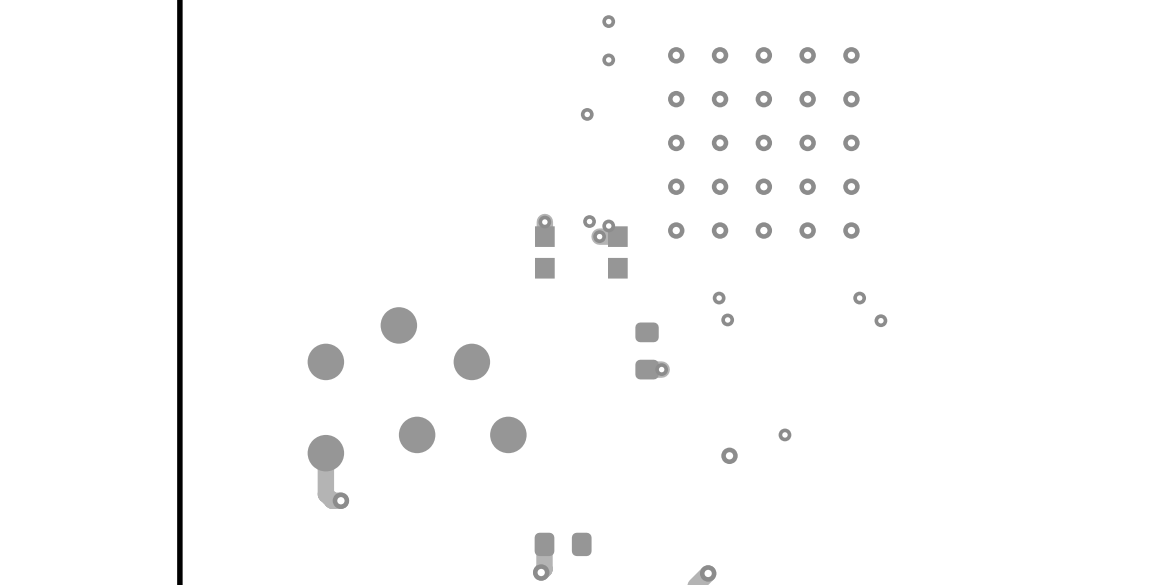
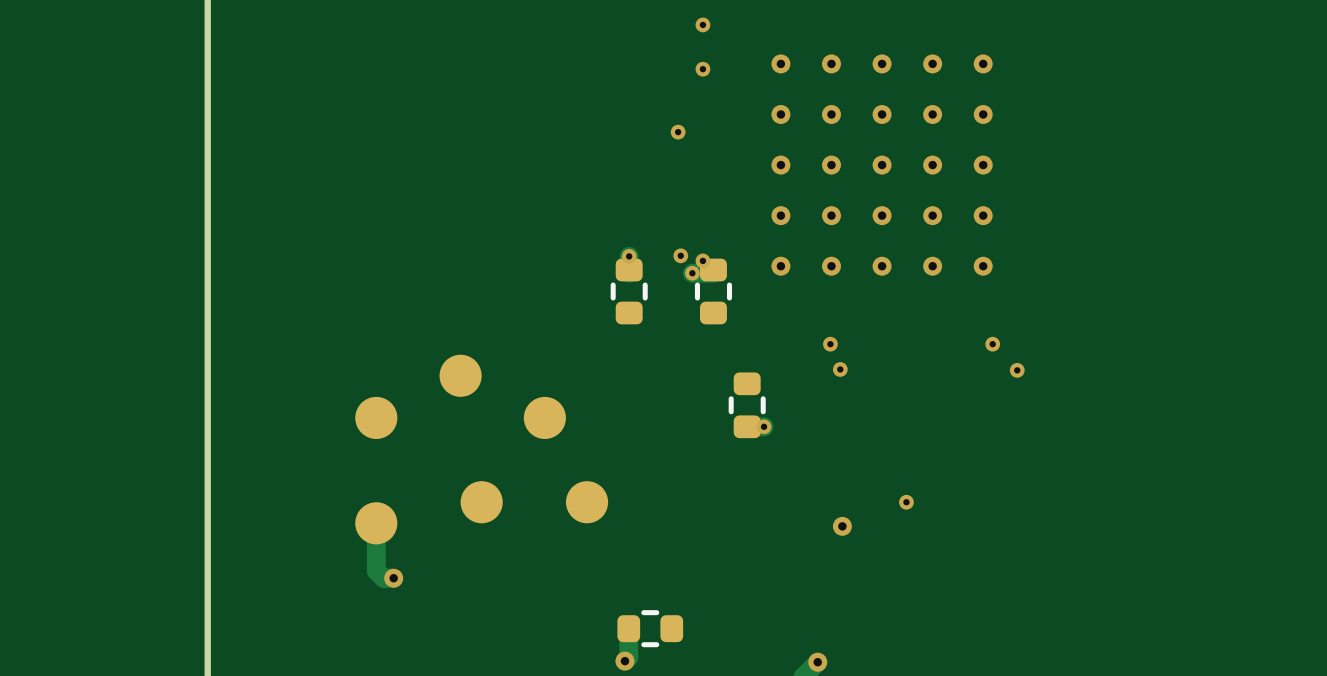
part footprint: [535, 226, 555, 279] -> [610, 258, 648, 325]
part footprint: [608, 226, 628, 279] -> [694, 258, 733, 325]
part footprint: [635, 322, 659, 380] -> [728, 372, 766, 439]
part footprint: [534, 532, 592, 557] -> [617, 610, 684, 648]

